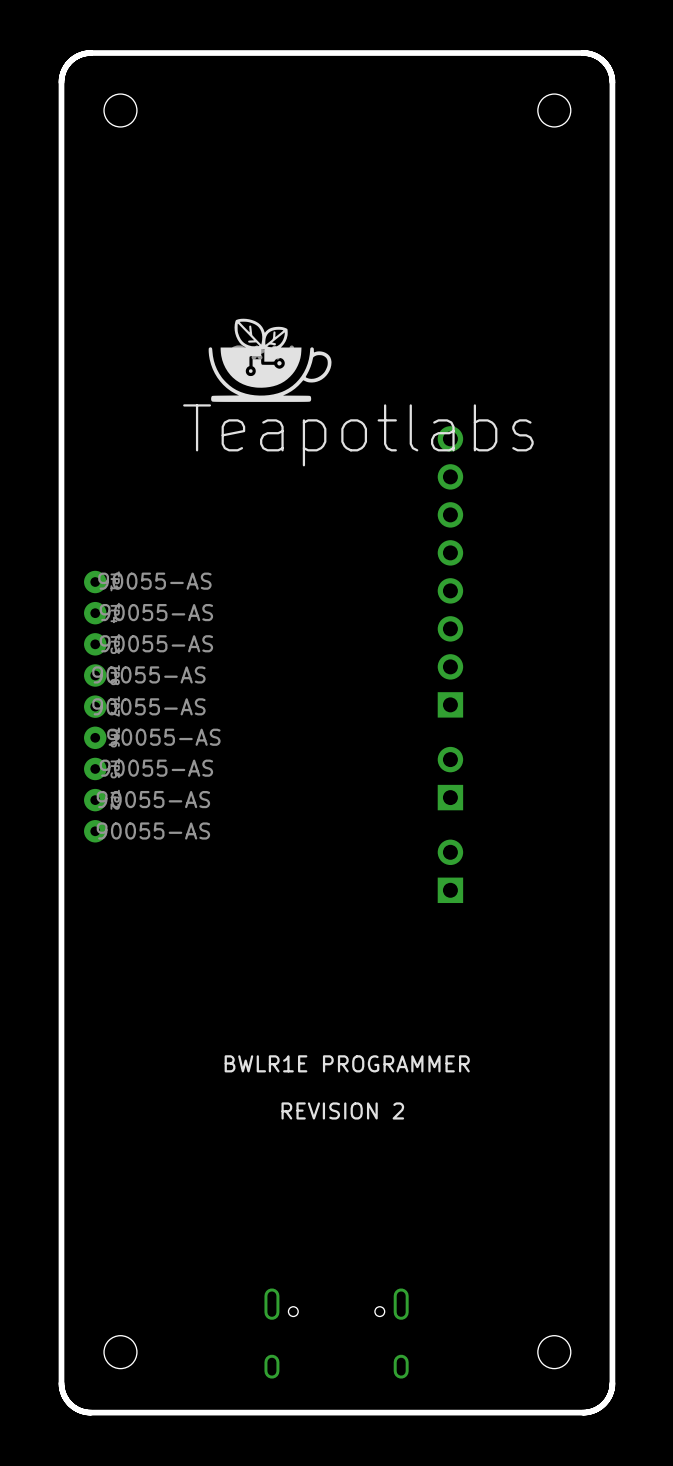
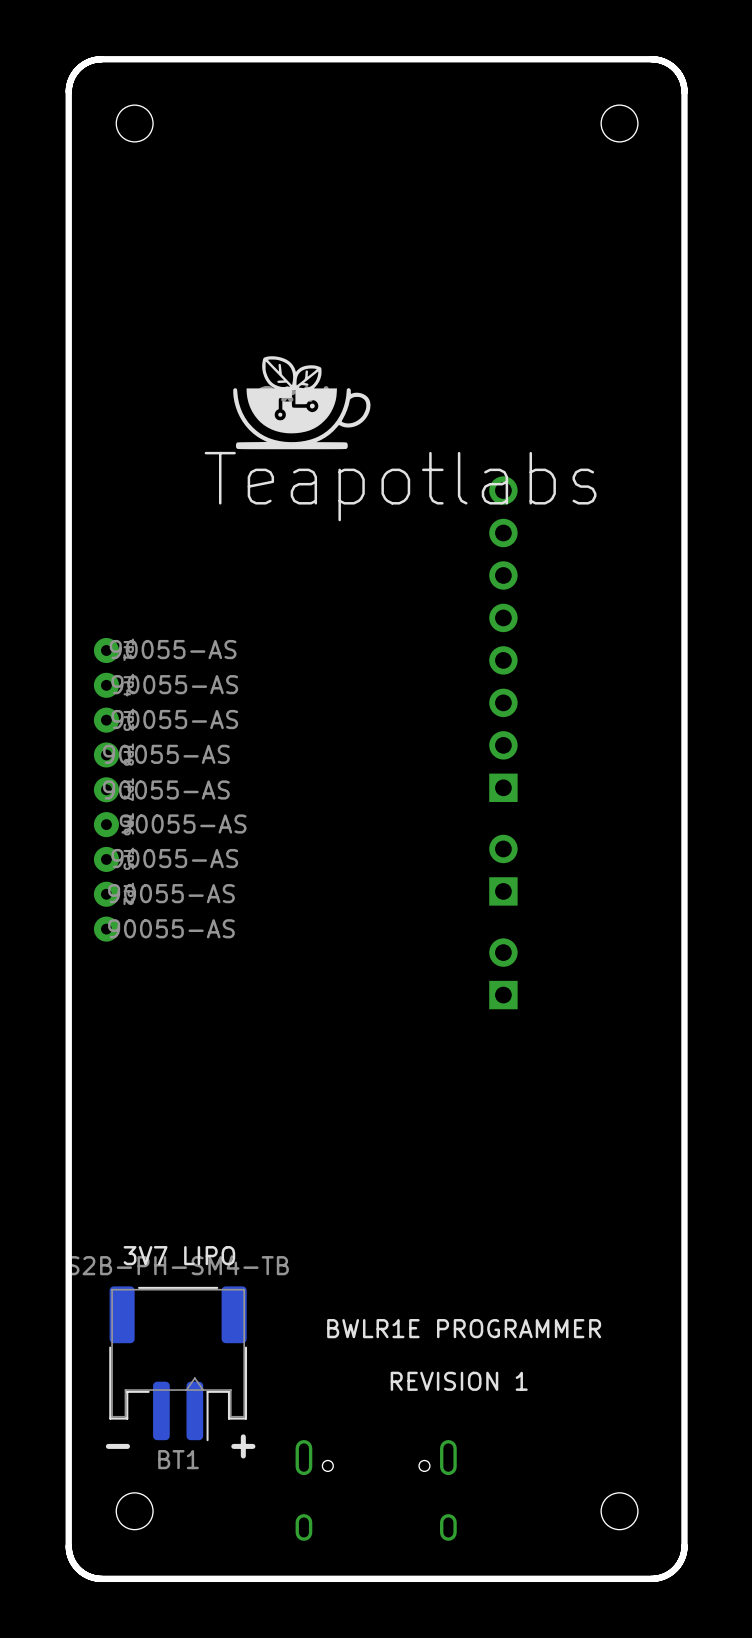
text position: BWLR1E PROGRAMMER (347, 1063) -> BWLR1E PROGRAMMER (464, 1328)
text: REVISION 2 (342, 1110) -> none
text: none -> 3V7 LIPO (179, 1255)
BT1: none -> S2B-PH-SM4-TB (178, 1363)
text: none -> REVISION 1 (459, 1381)
text: none -> - (117, 1446)
text: none -> + (243, 1446)

